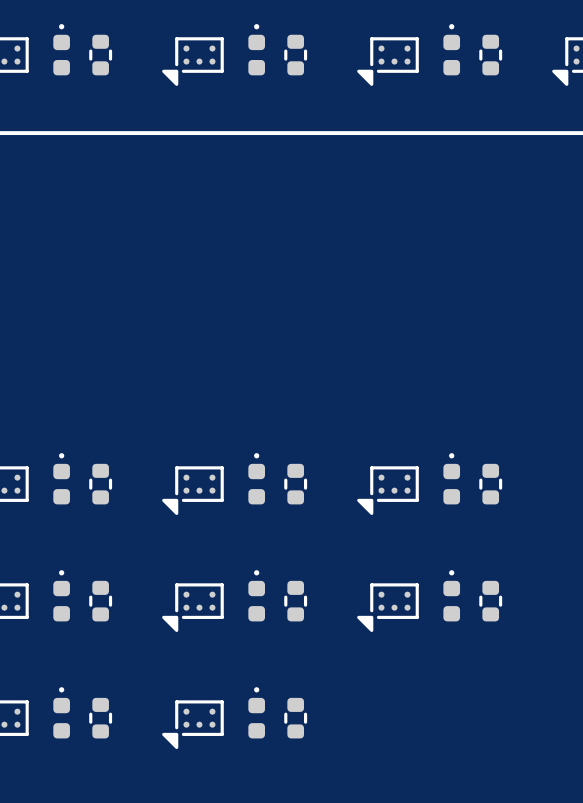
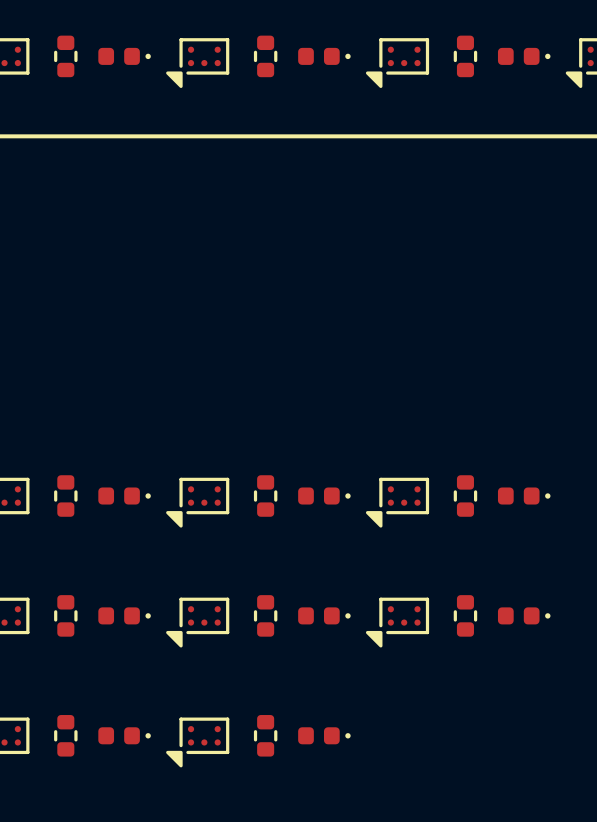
part footprint: [53, 24, 70, 76] -> [54, 35, 78, 78]
part footprint: [248, 24, 266, 76] -> [253, 35, 278, 78]
part footprint: [443, 24, 461, 76] -> [453, 35, 478, 78]
part: (100, 55) -> none
part: none -> (124, 56)
part: (295, 55) -> none
part: none -> (324, 56)
part: (490, 55) -> none
part: none -> (524, 56)
part footprint: [53, 453, 70, 505] -> [54, 475, 78, 517]
part footprint: [248, 453, 266, 505] -> [253, 475, 278, 517]
part footprint: [443, 453, 461, 505] -> [453, 475, 478, 517]
part: (100, 484) -> none
part: none -> (124, 496)
part: (295, 484) -> none
part: none -> (324, 496)
part: (490, 484) -> none
part: none -> (524, 496)
part footprint: [53, 570, 70, 622] -> [54, 595, 78, 637]
part footprint: [248, 570, 266, 622] -> [253, 595, 278, 637]
part footprint: [443, 570, 461, 622] -> [453, 595, 478, 637]
part: (100, 601) -> none
part: none -> (124, 615)
part: (295, 601) -> none
part: none -> (324, 615)
part: (490, 601) -> none
part: none -> (524, 615)
part footprint: [53, 687, 70, 739] -> [54, 715, 78, 757]
part footprint: [248, 687, 266, 739] -> [253, 715, 278, 757]
part: (100, 718) -> none
part: none -> (124, 735)
part: (295, 718) -> none
part: none -> (324, 735)

